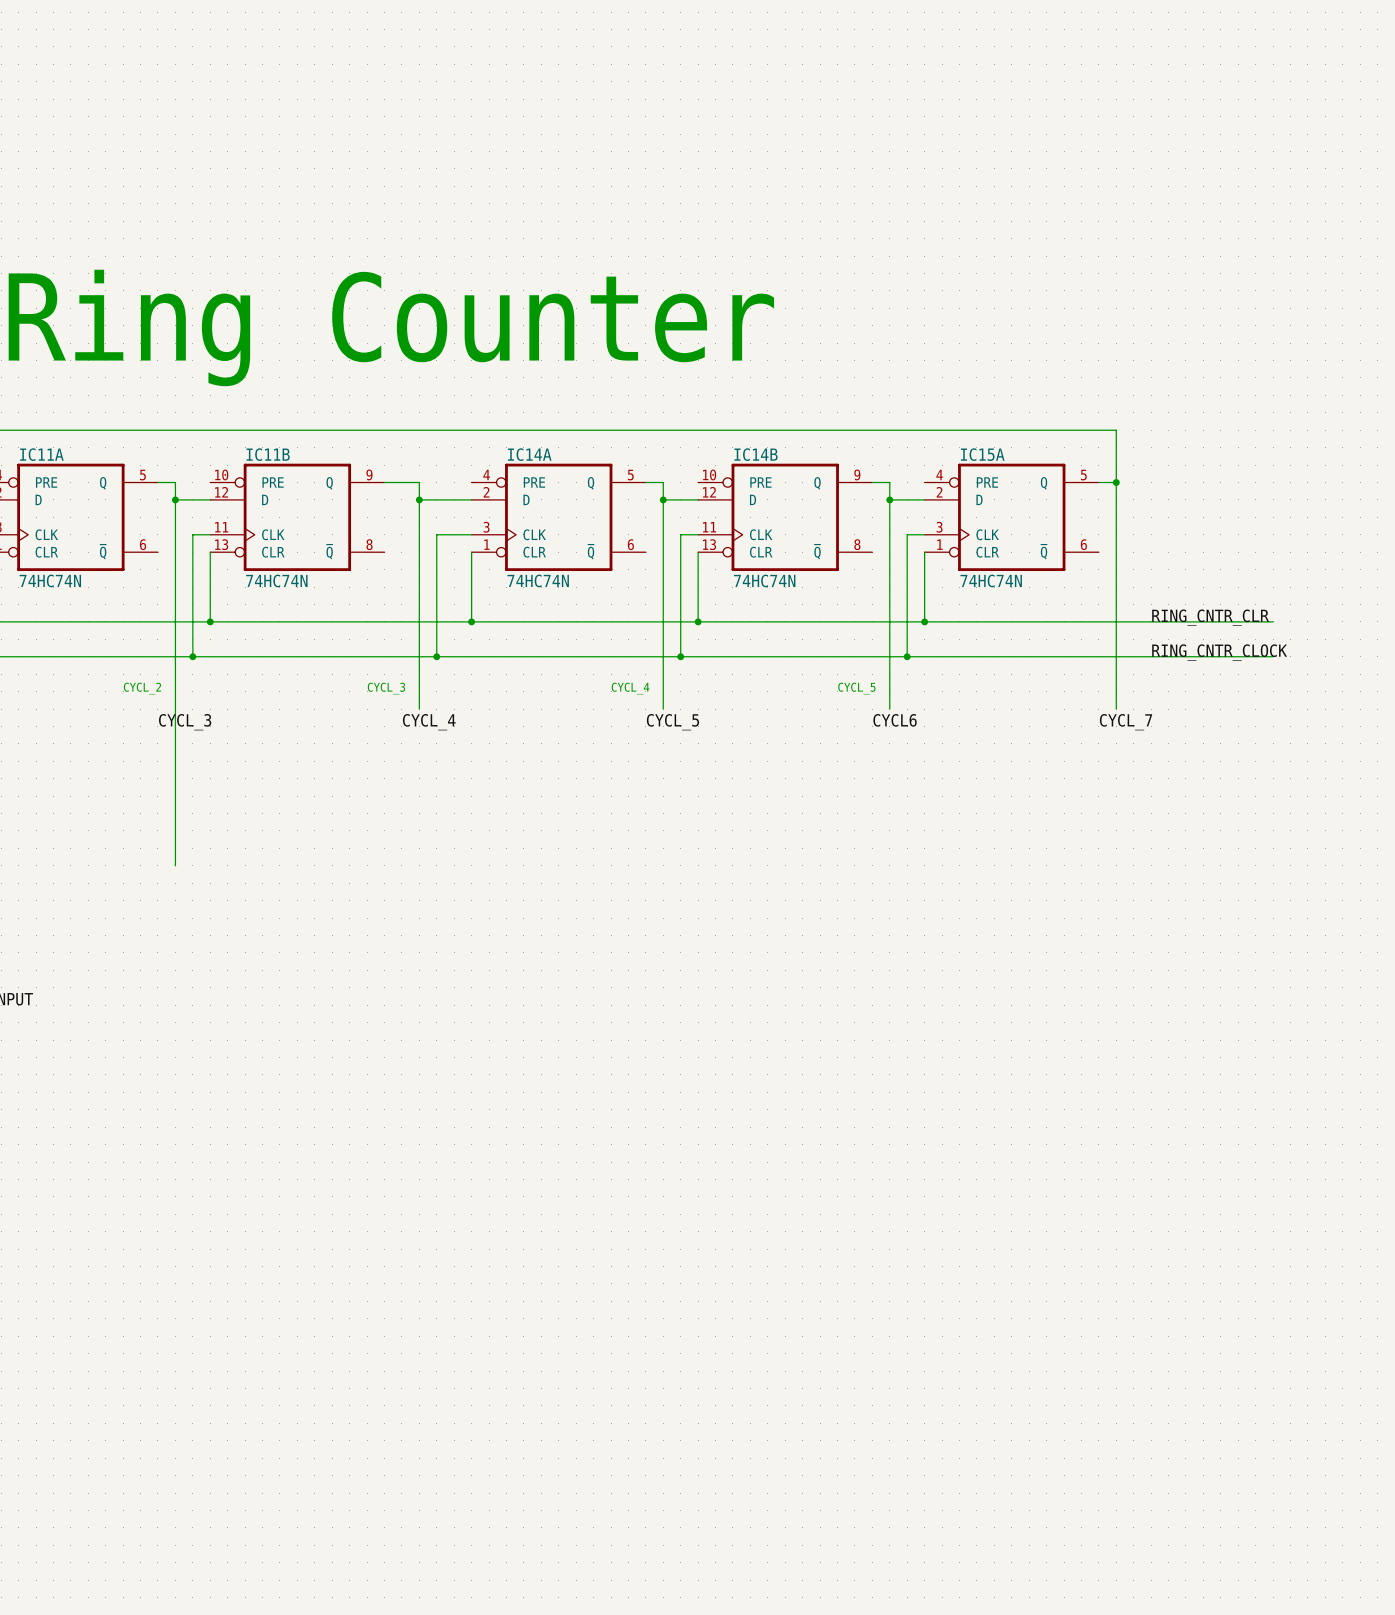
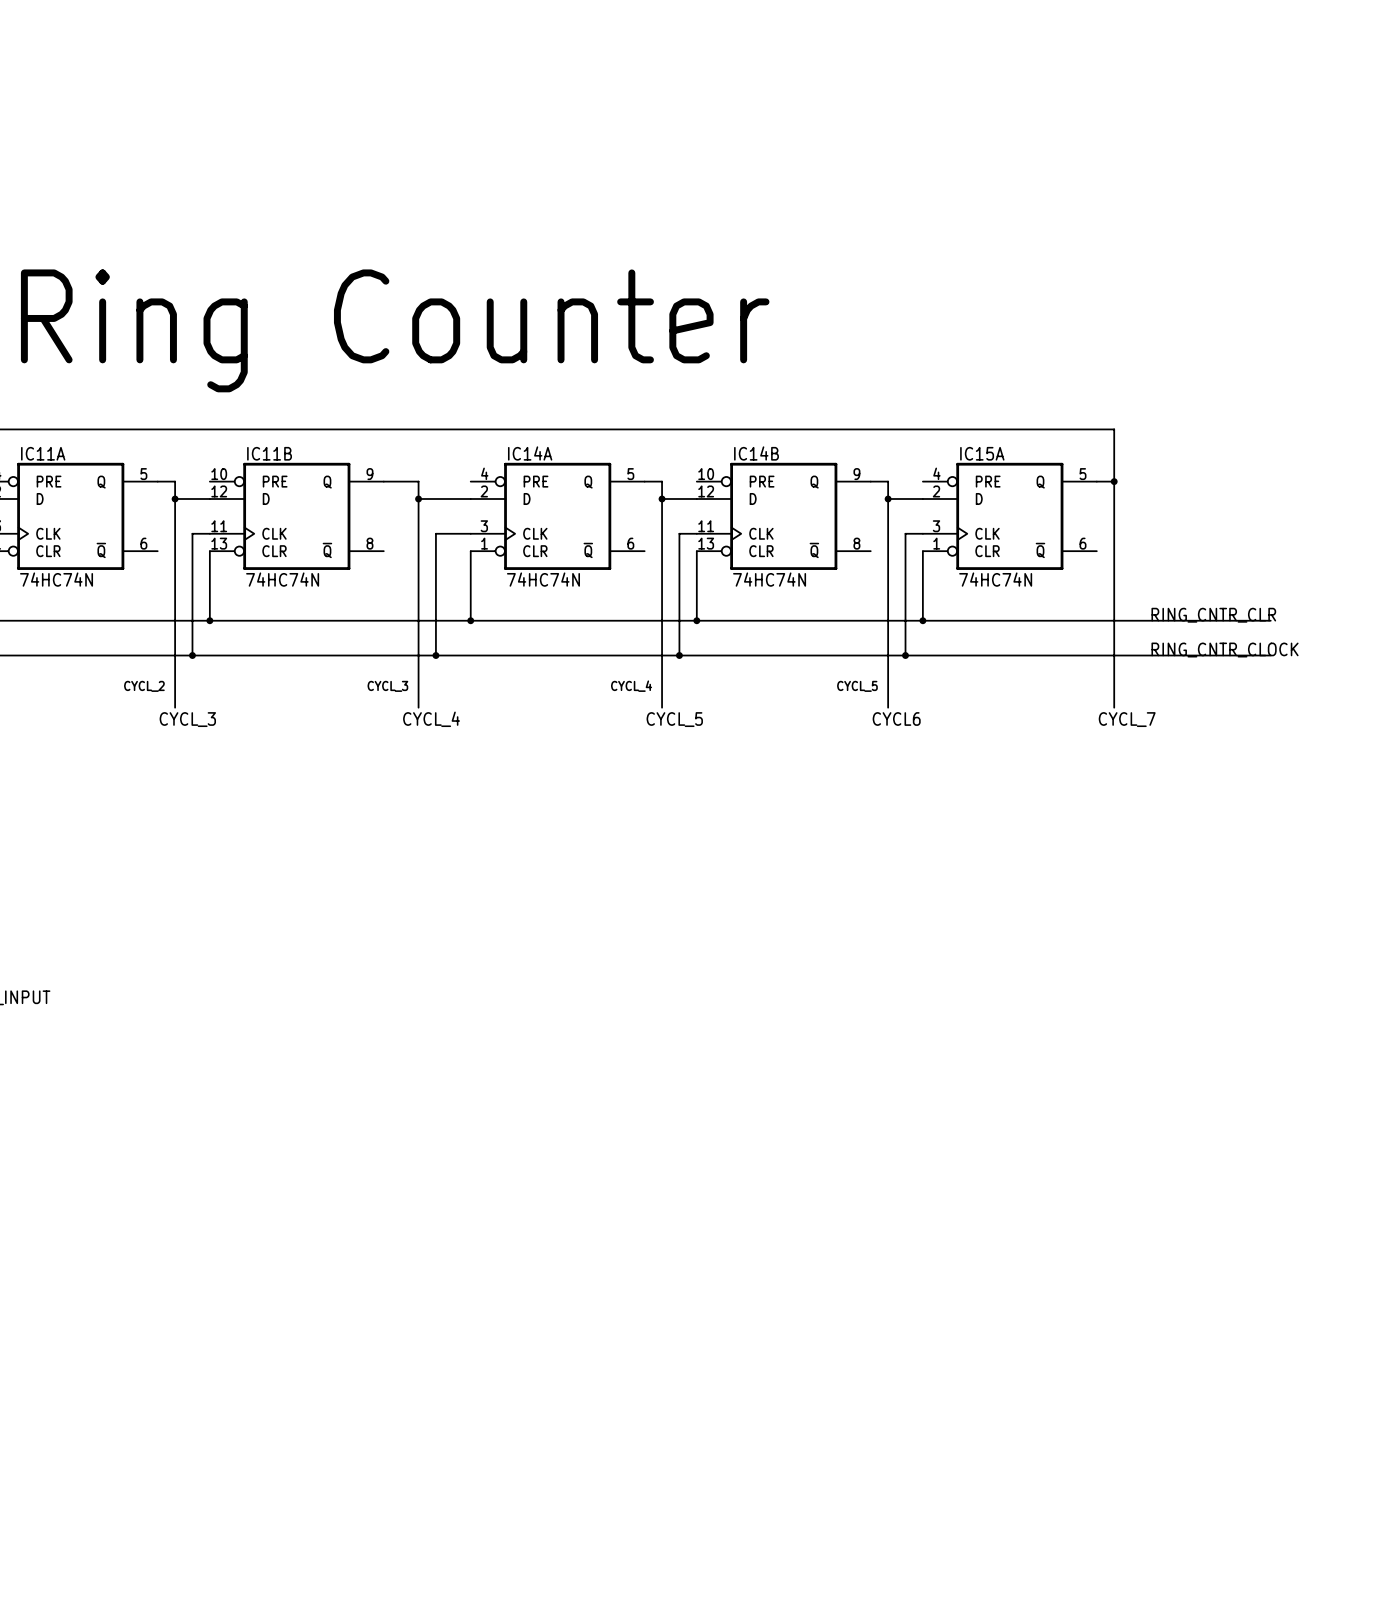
wire: (175, 709) (175, 865) -> none

